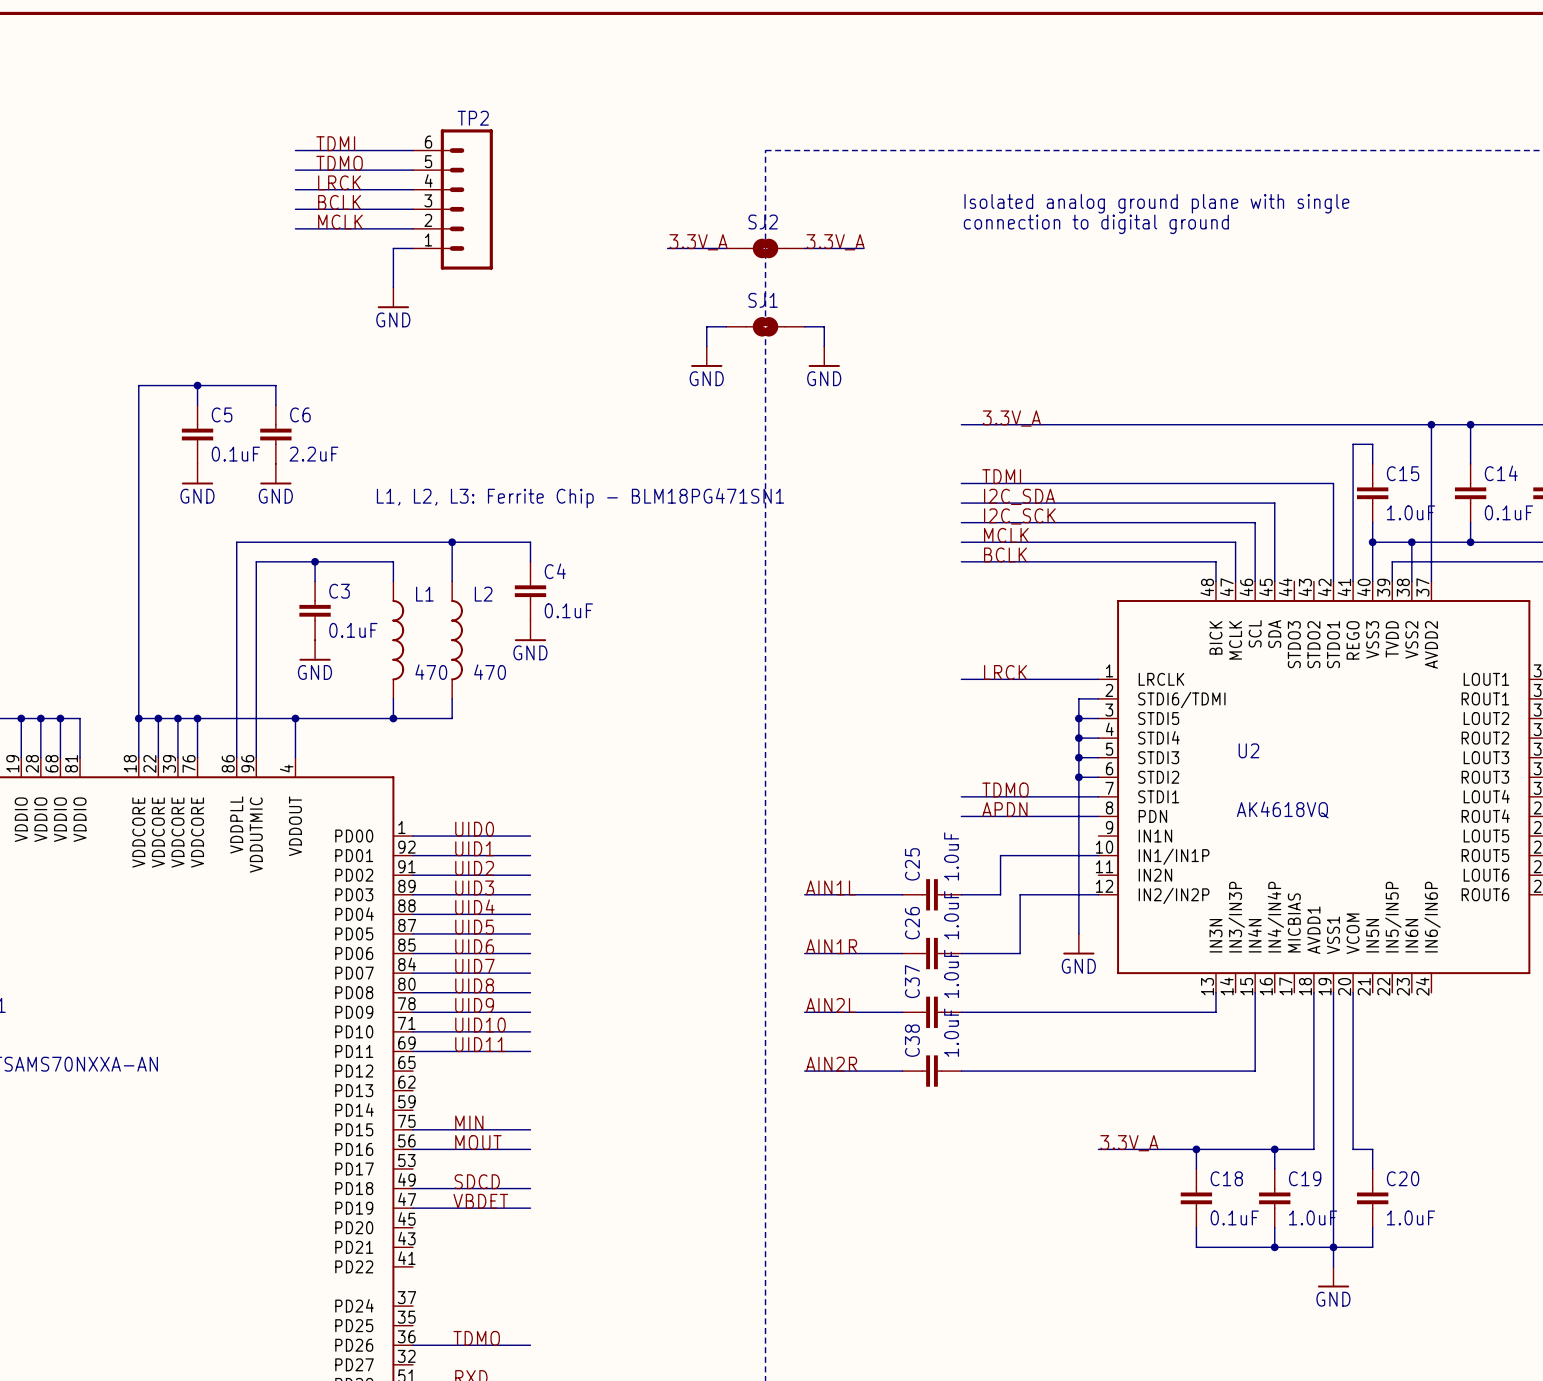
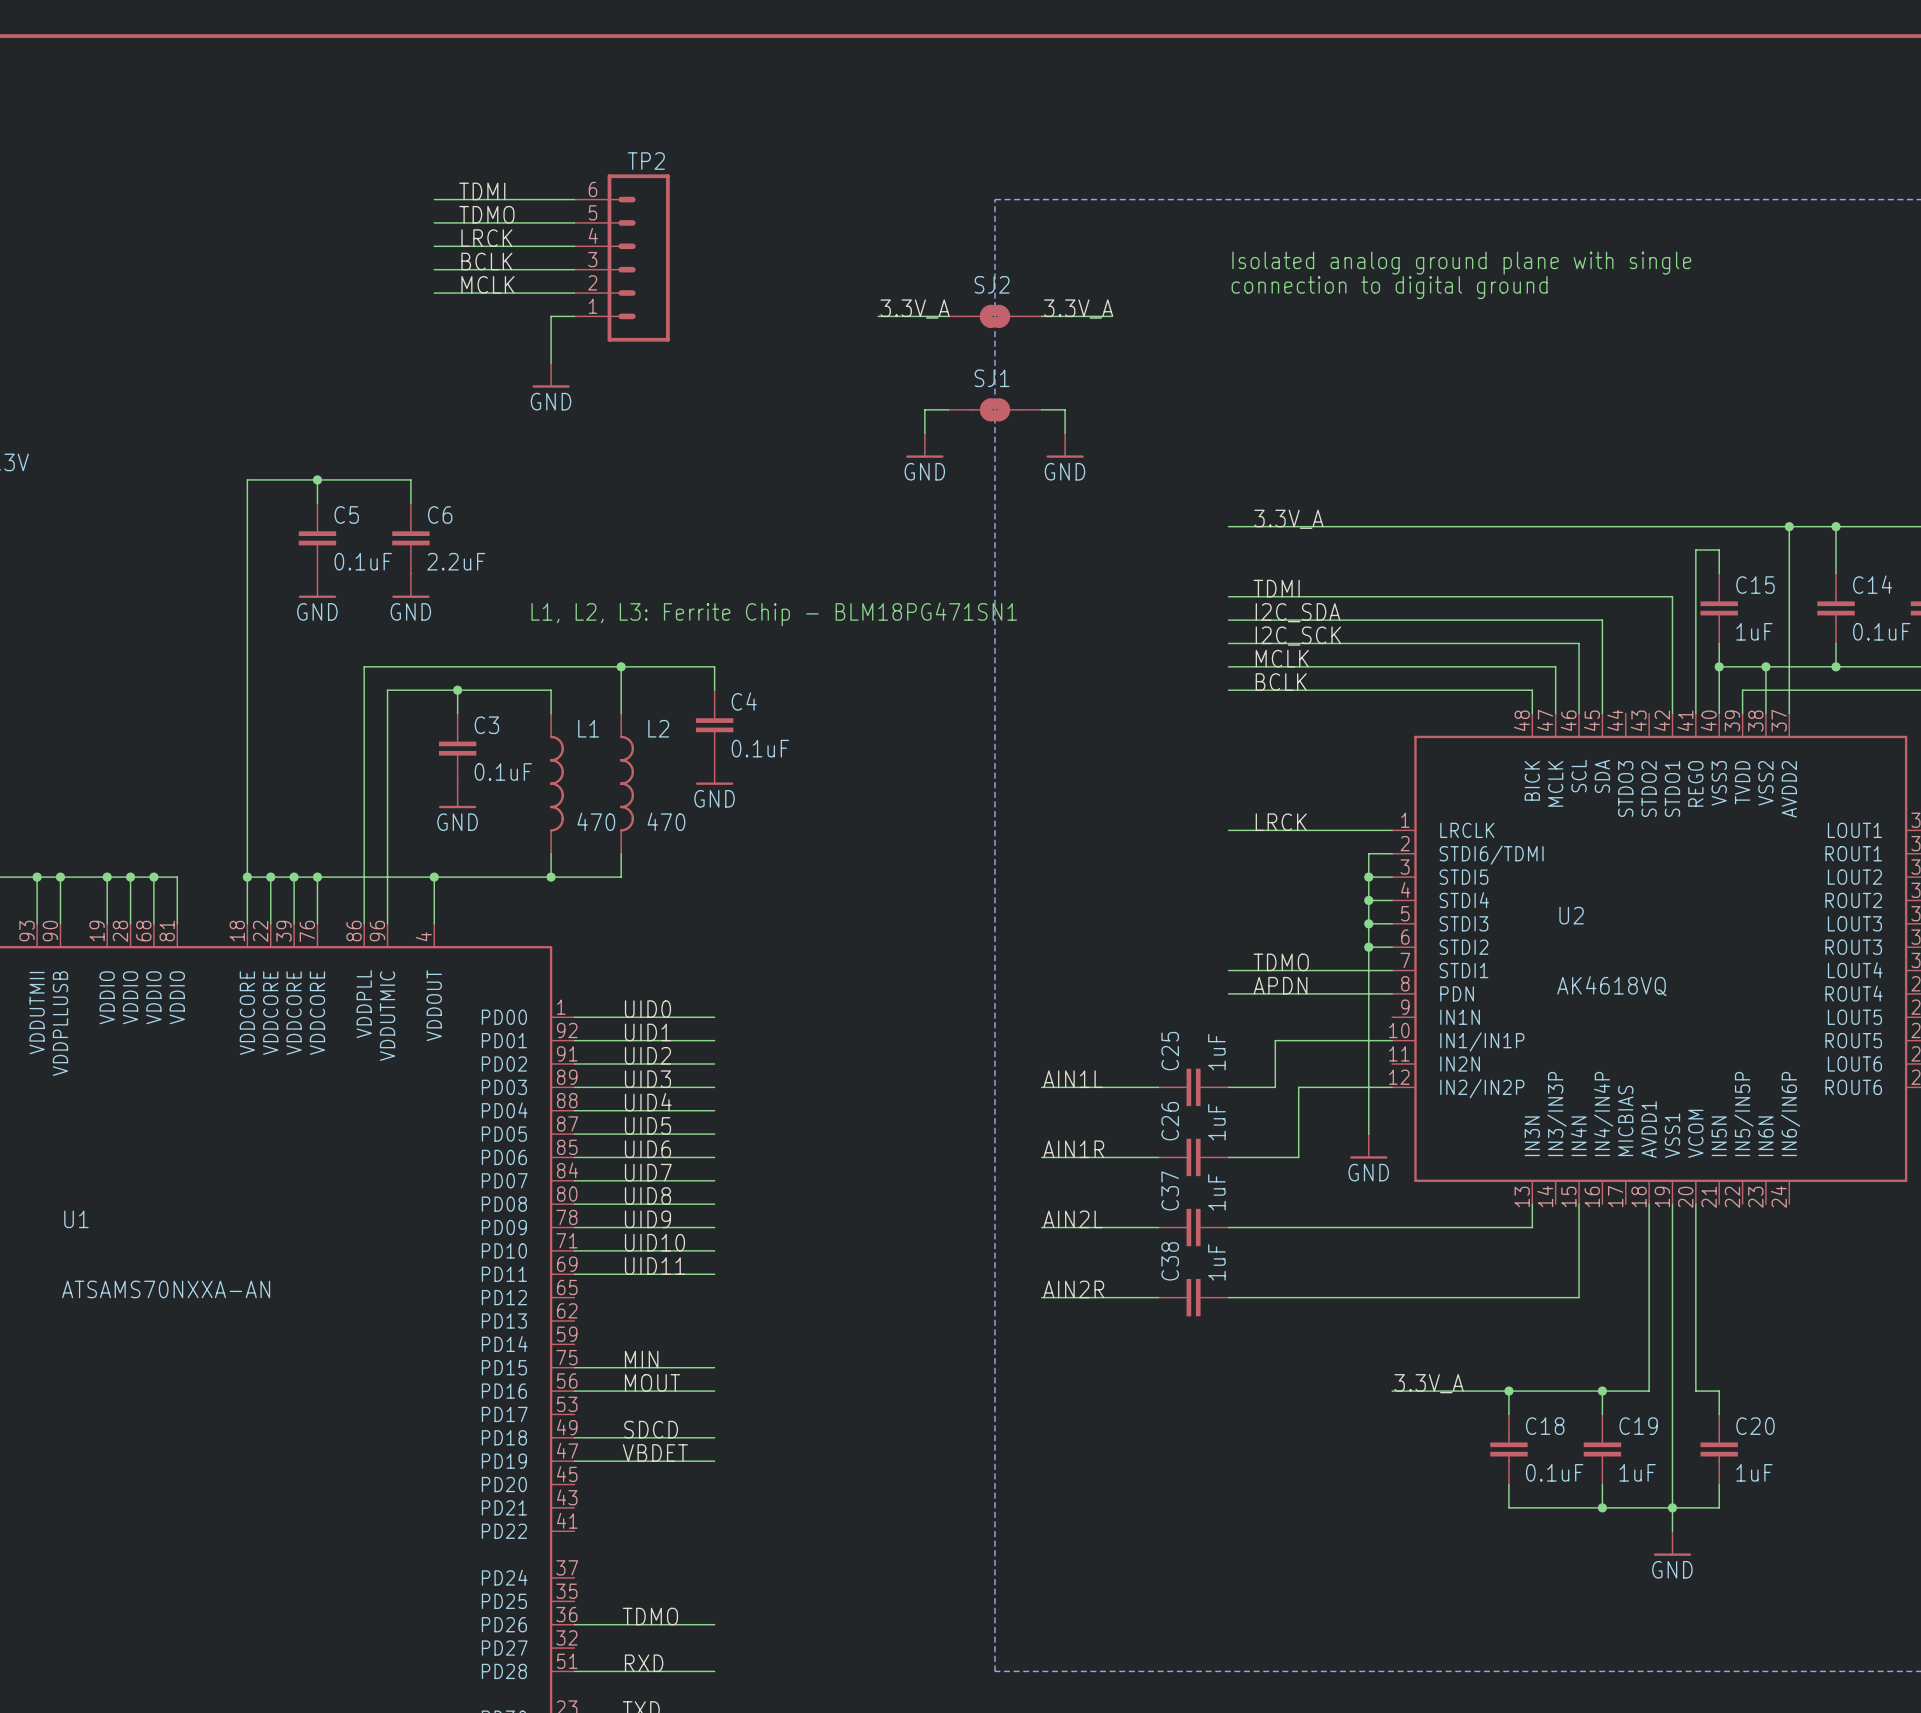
C15 value: 1.0uF (1410, 512) -> 1uF (1754, 631)
C25 value: 1.0uF (951, 856) -> 1uF (1216, 1052)
C26 value: 1.0uF (951, 915) -> 1uF (1216, 1122)
C37 value: 1.0uF (951, 973) -> 1uF (1216, 1192)
C38 value: 1.0uF (951, 1032) -> 1uF (1216, 1262)
C19 value: 1.0uF (1313, 1217) -> 1uF (1637, 1472)
C20 value: 1.0uF (1410, 1217) -> 1uF (1754, 1472)

